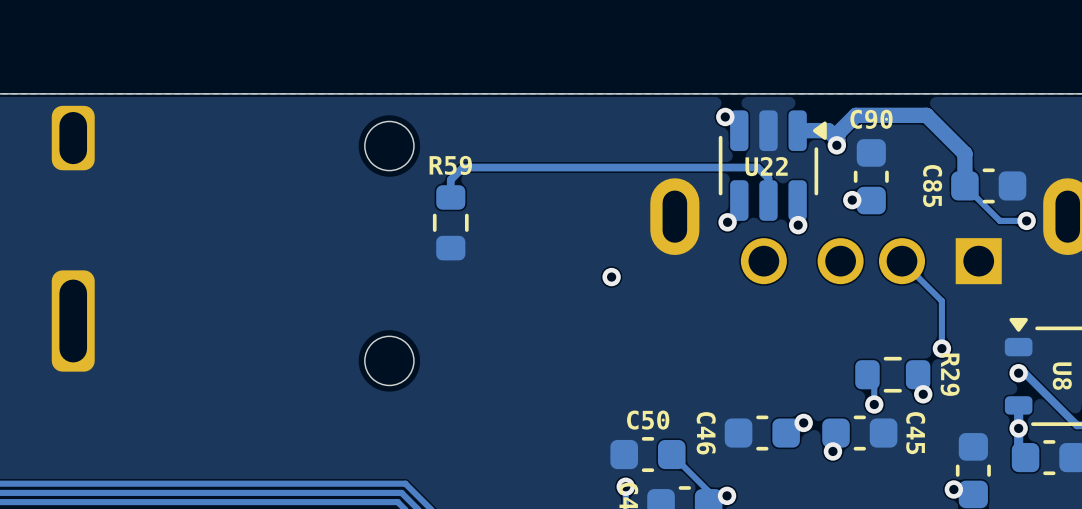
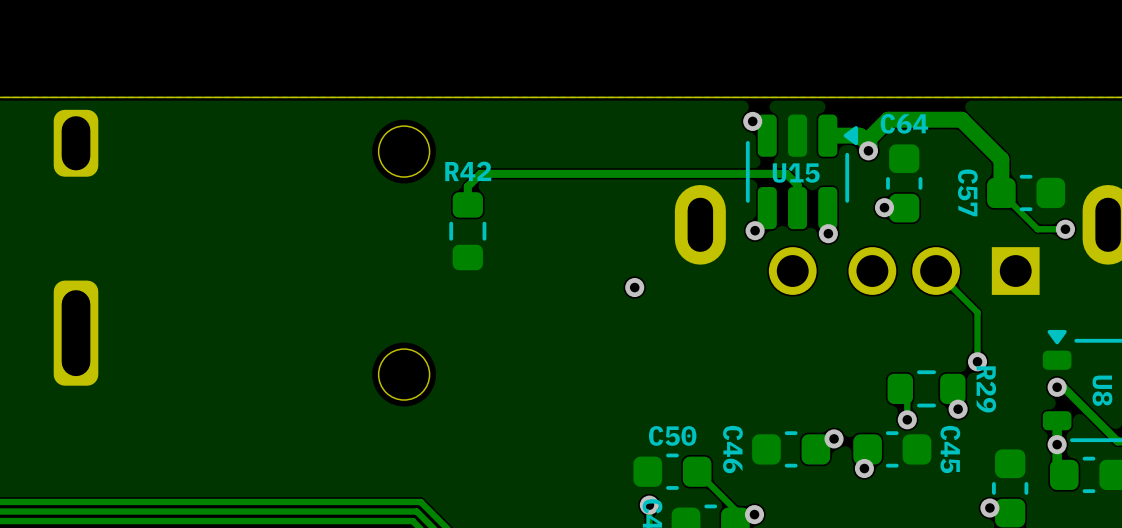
C90 name: C90 (871, 119) -> C64 (904, 123)
R59 name: R59 (450, 165) -> R42 (468, 171)
U22 name: U22 (766, 166) -> U15 (796, 173)
C85 name: C85 (932, 186) -> C57 (967, 192)

